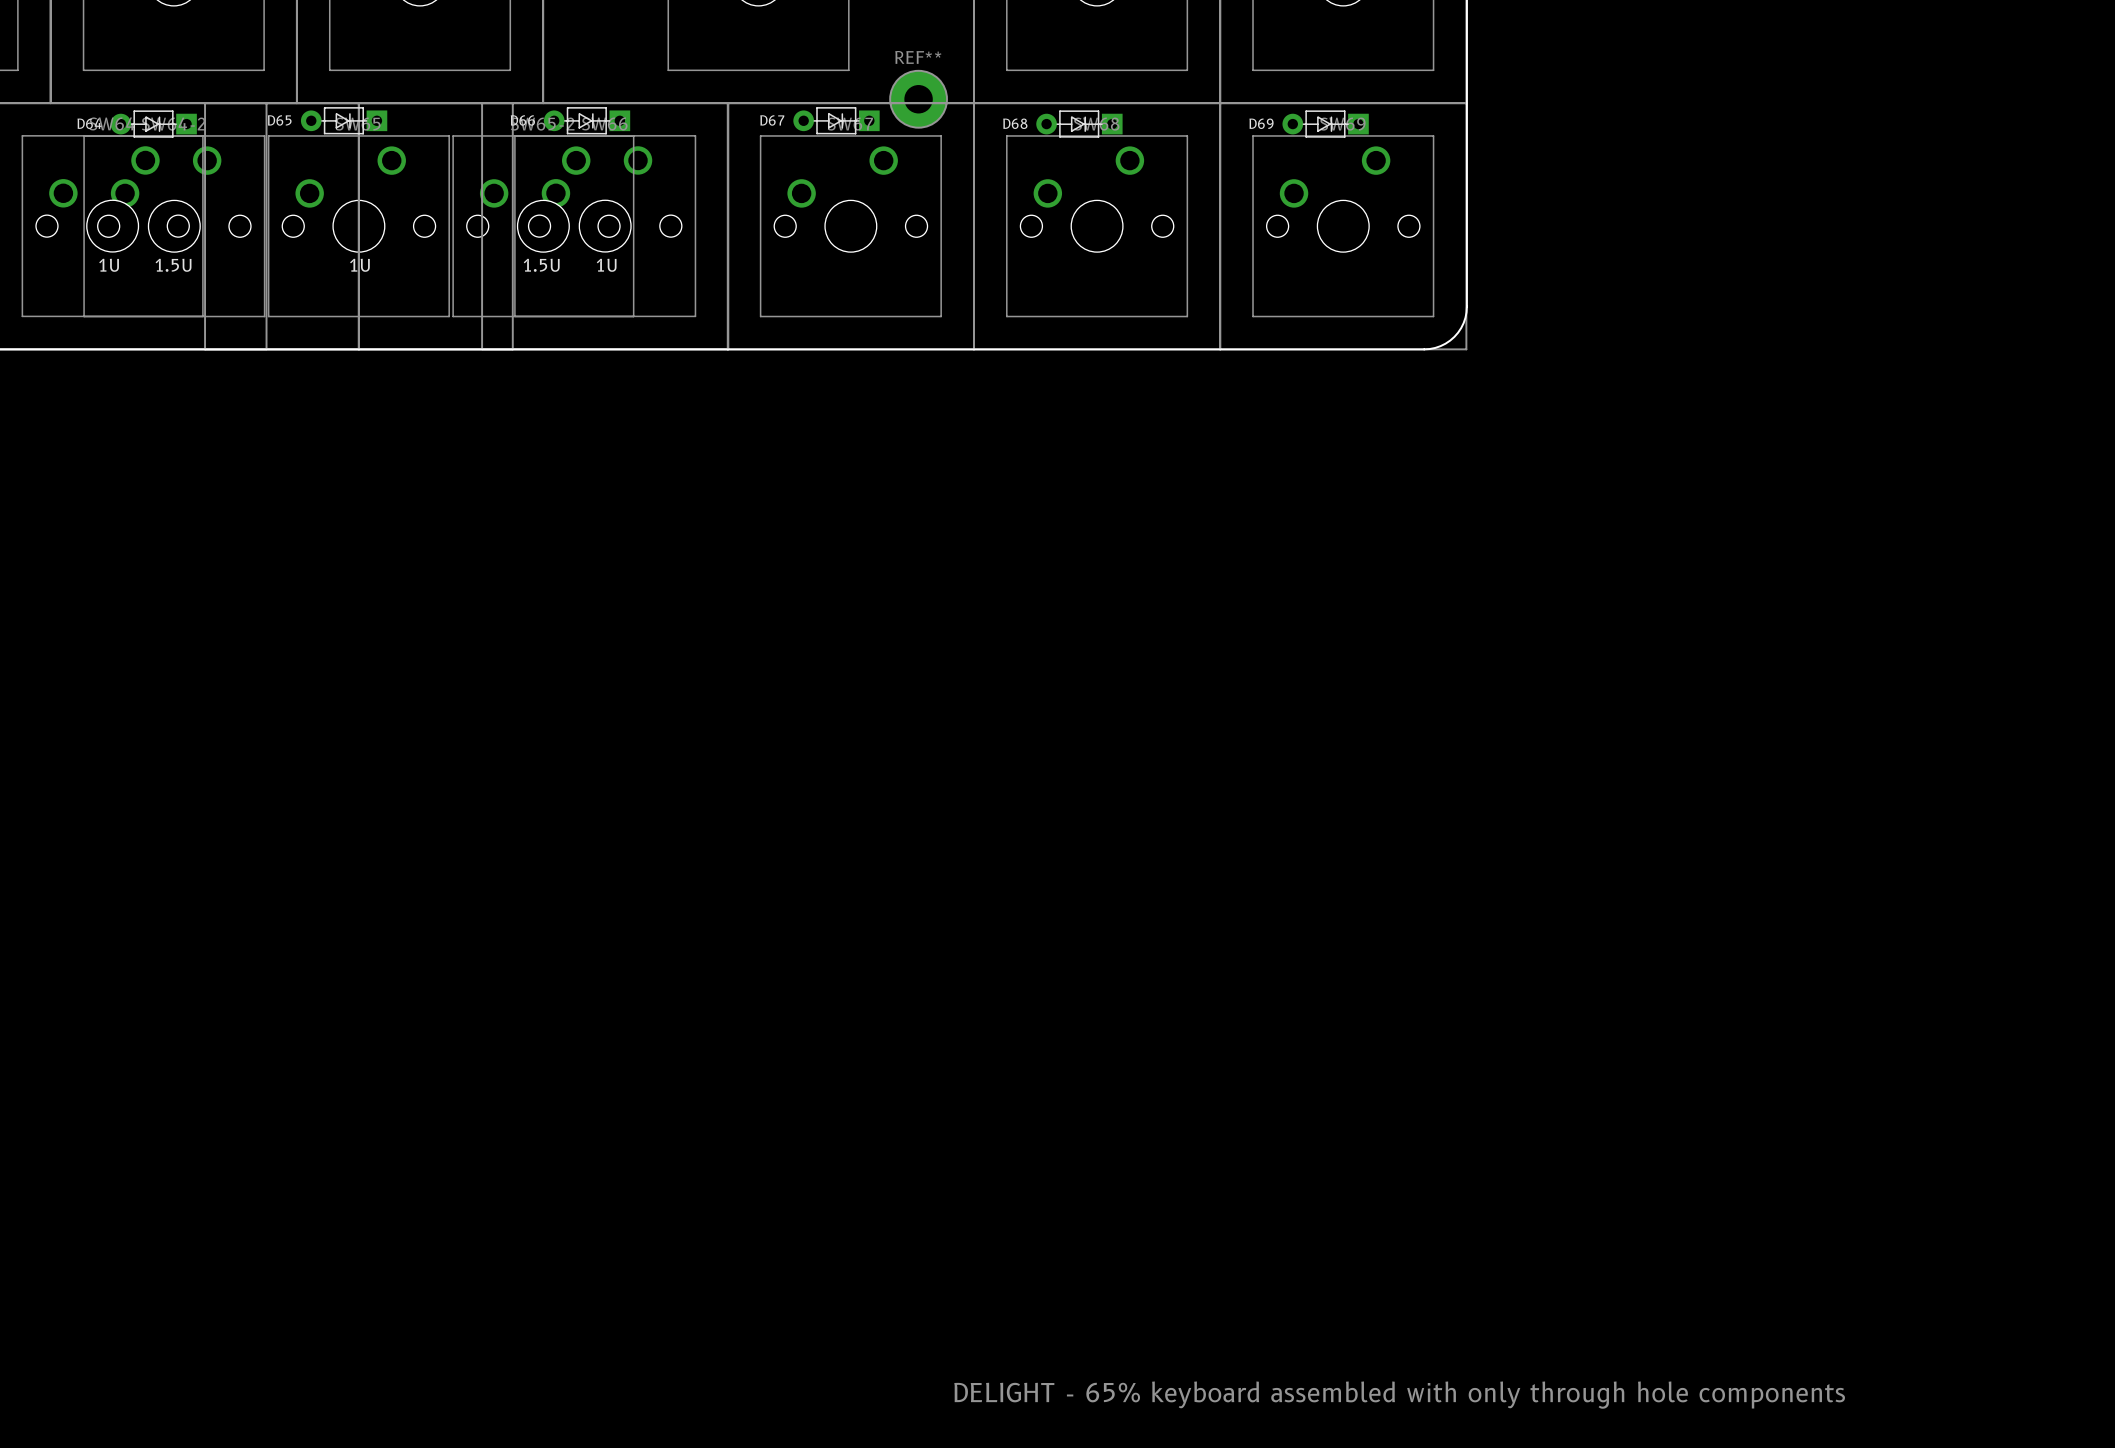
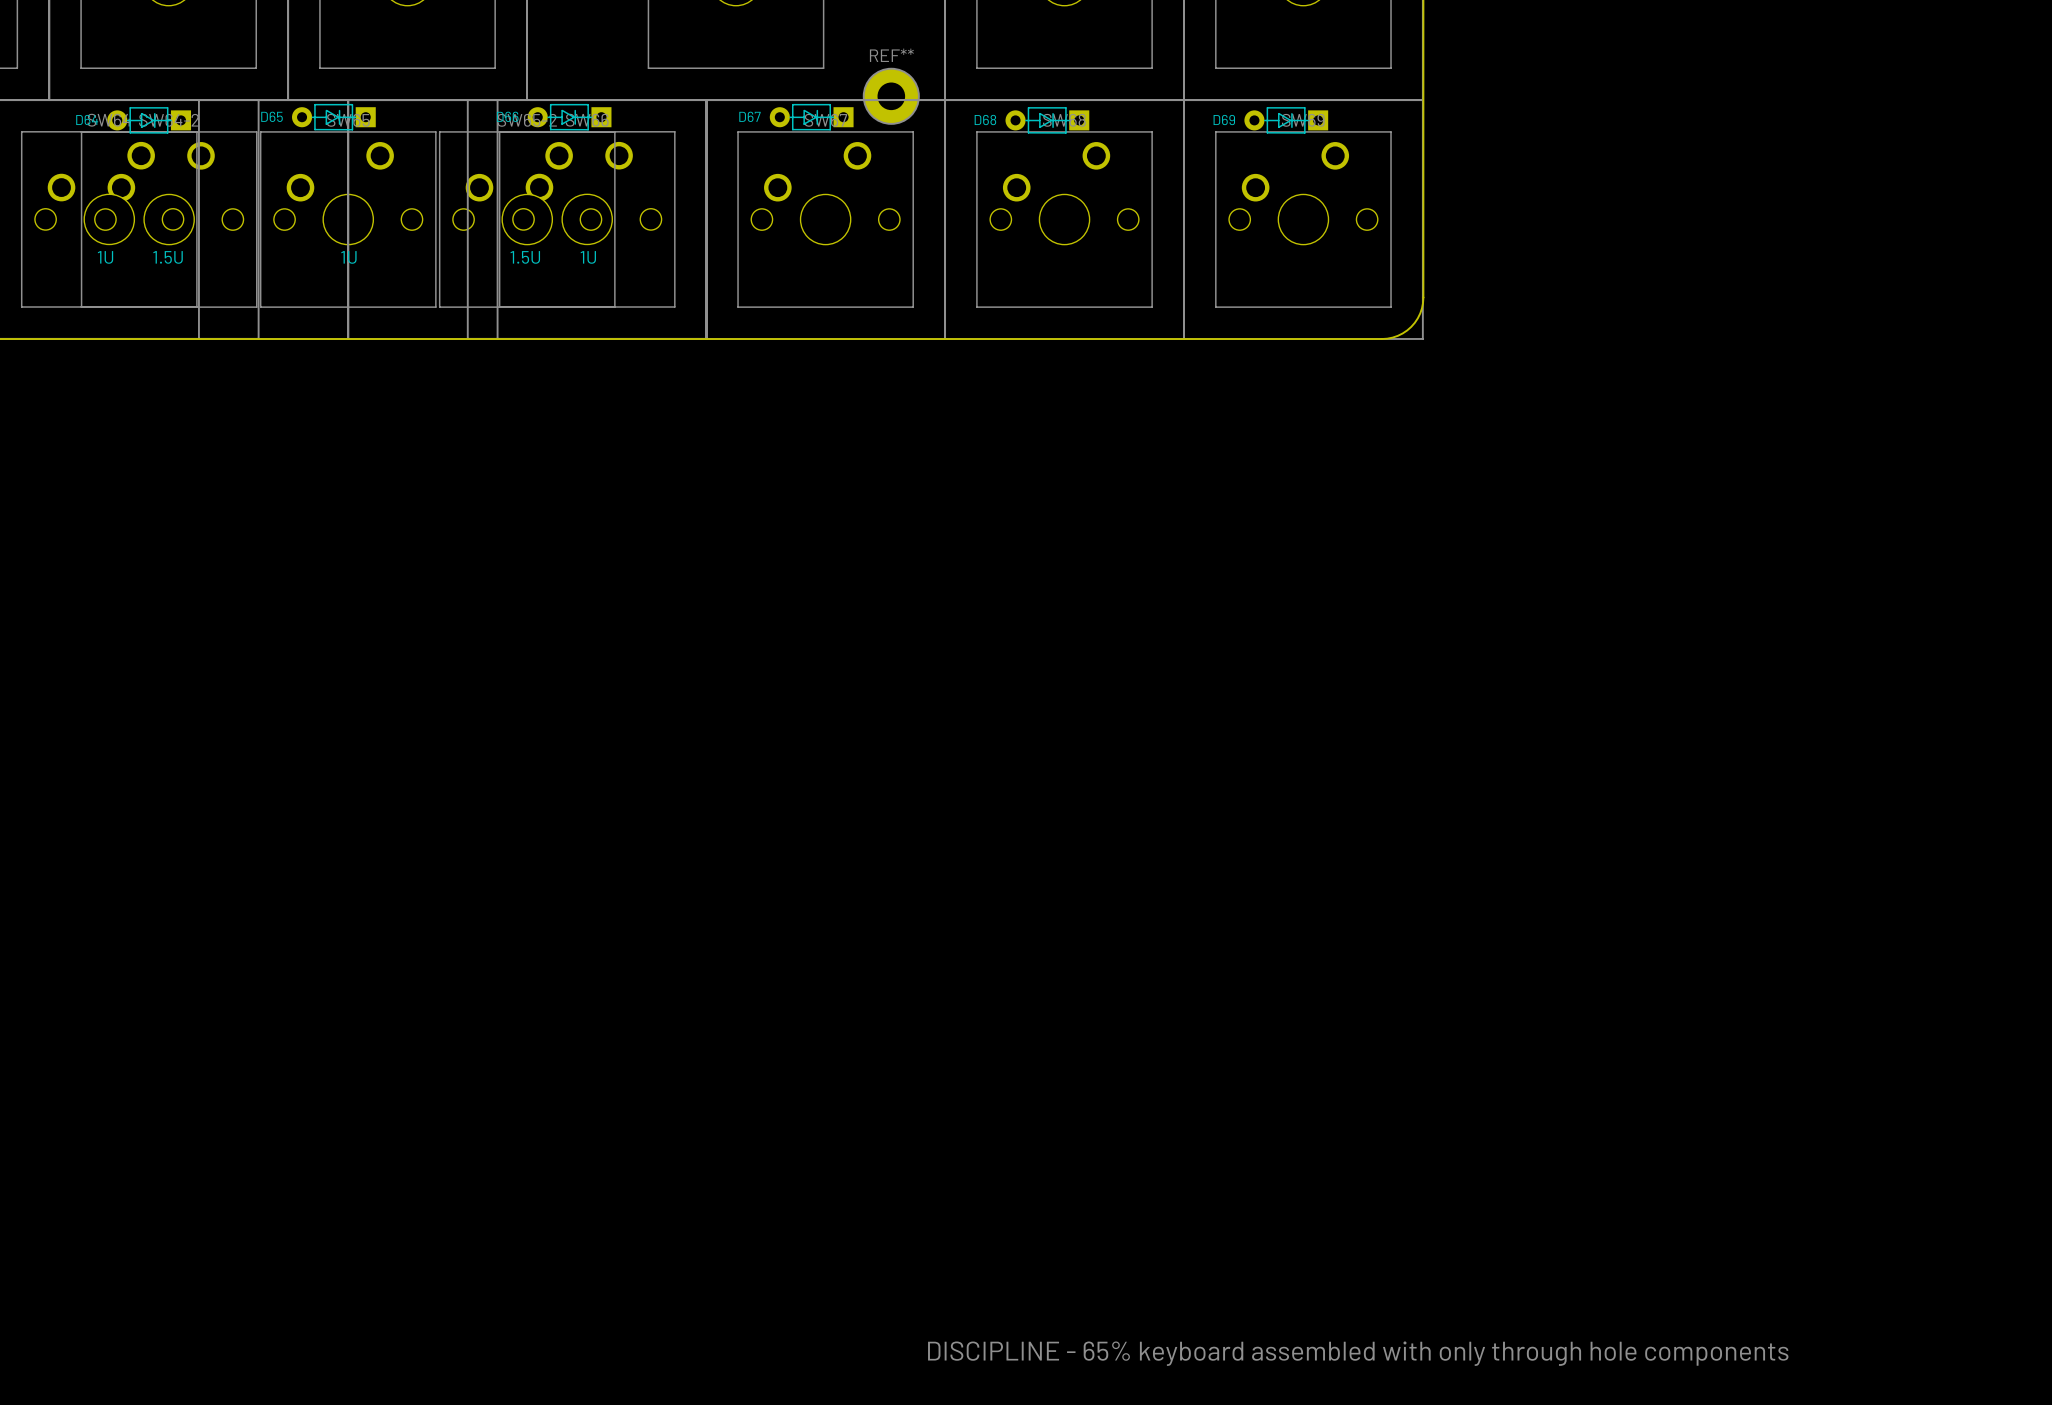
text: DELIGHT - 65% keyboard assembled with only through hole components (1399, 1395) -> DISCIPLINE - 65% keyboard assembled with only through hole components (1358, 1353)

